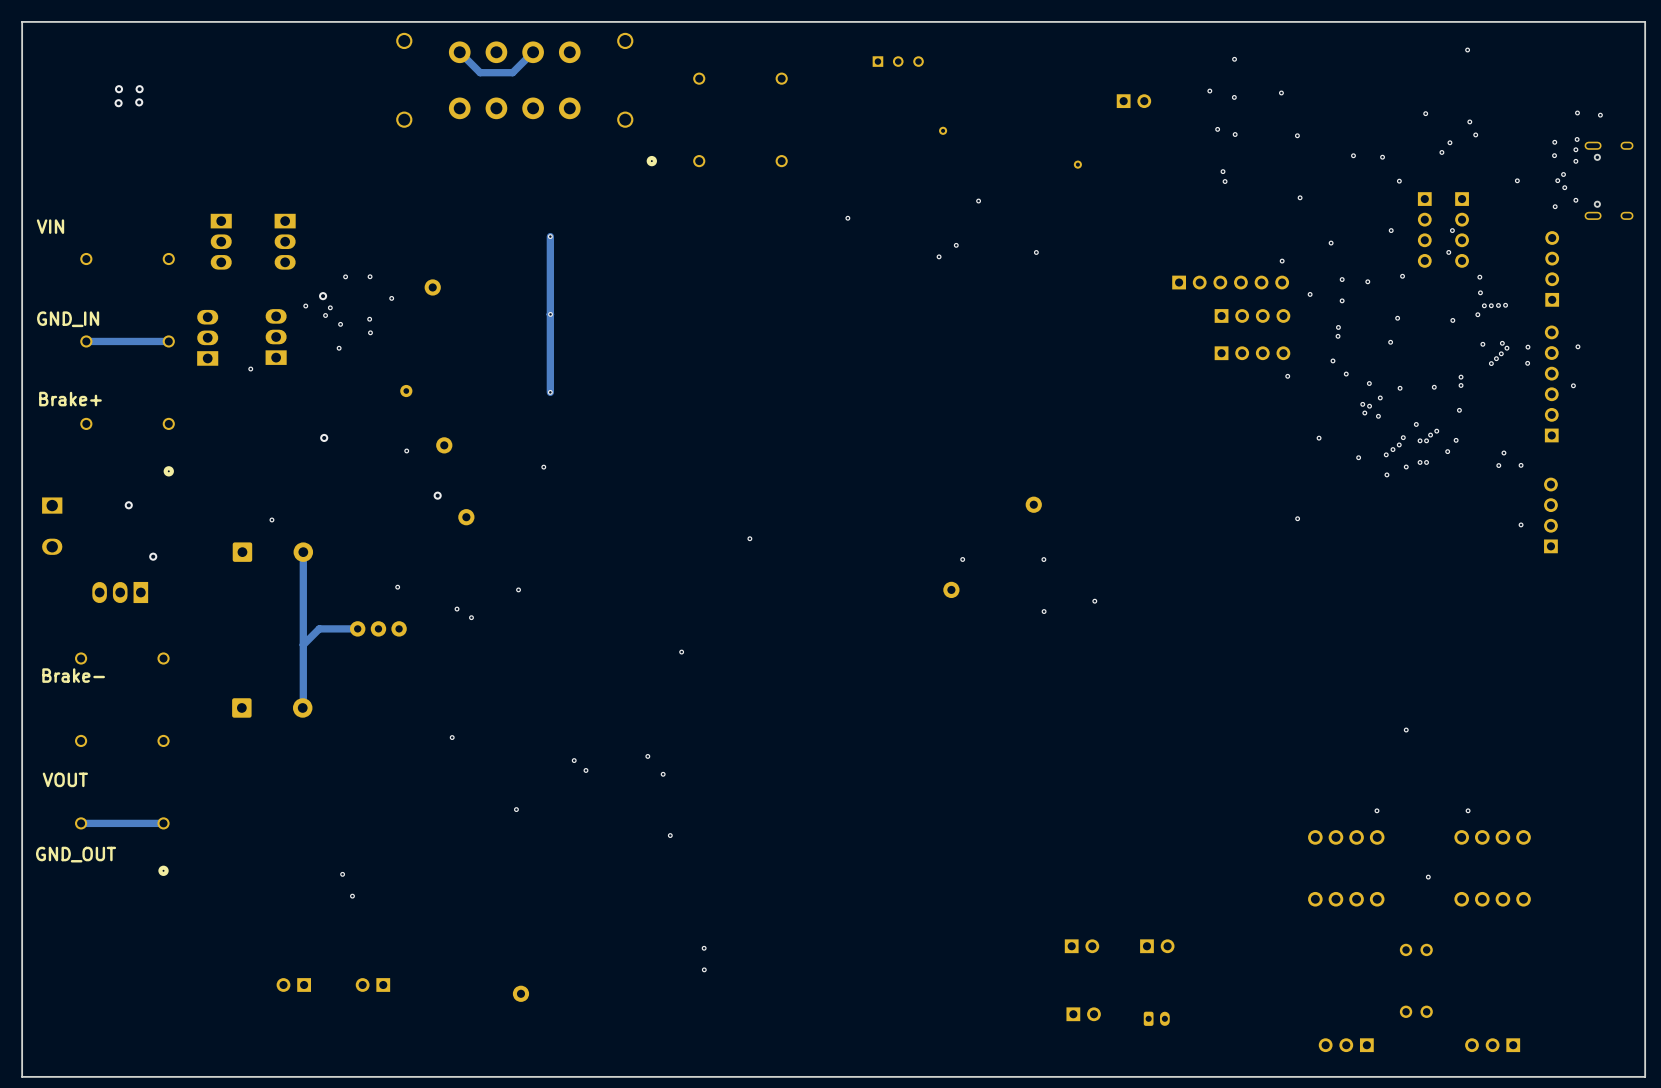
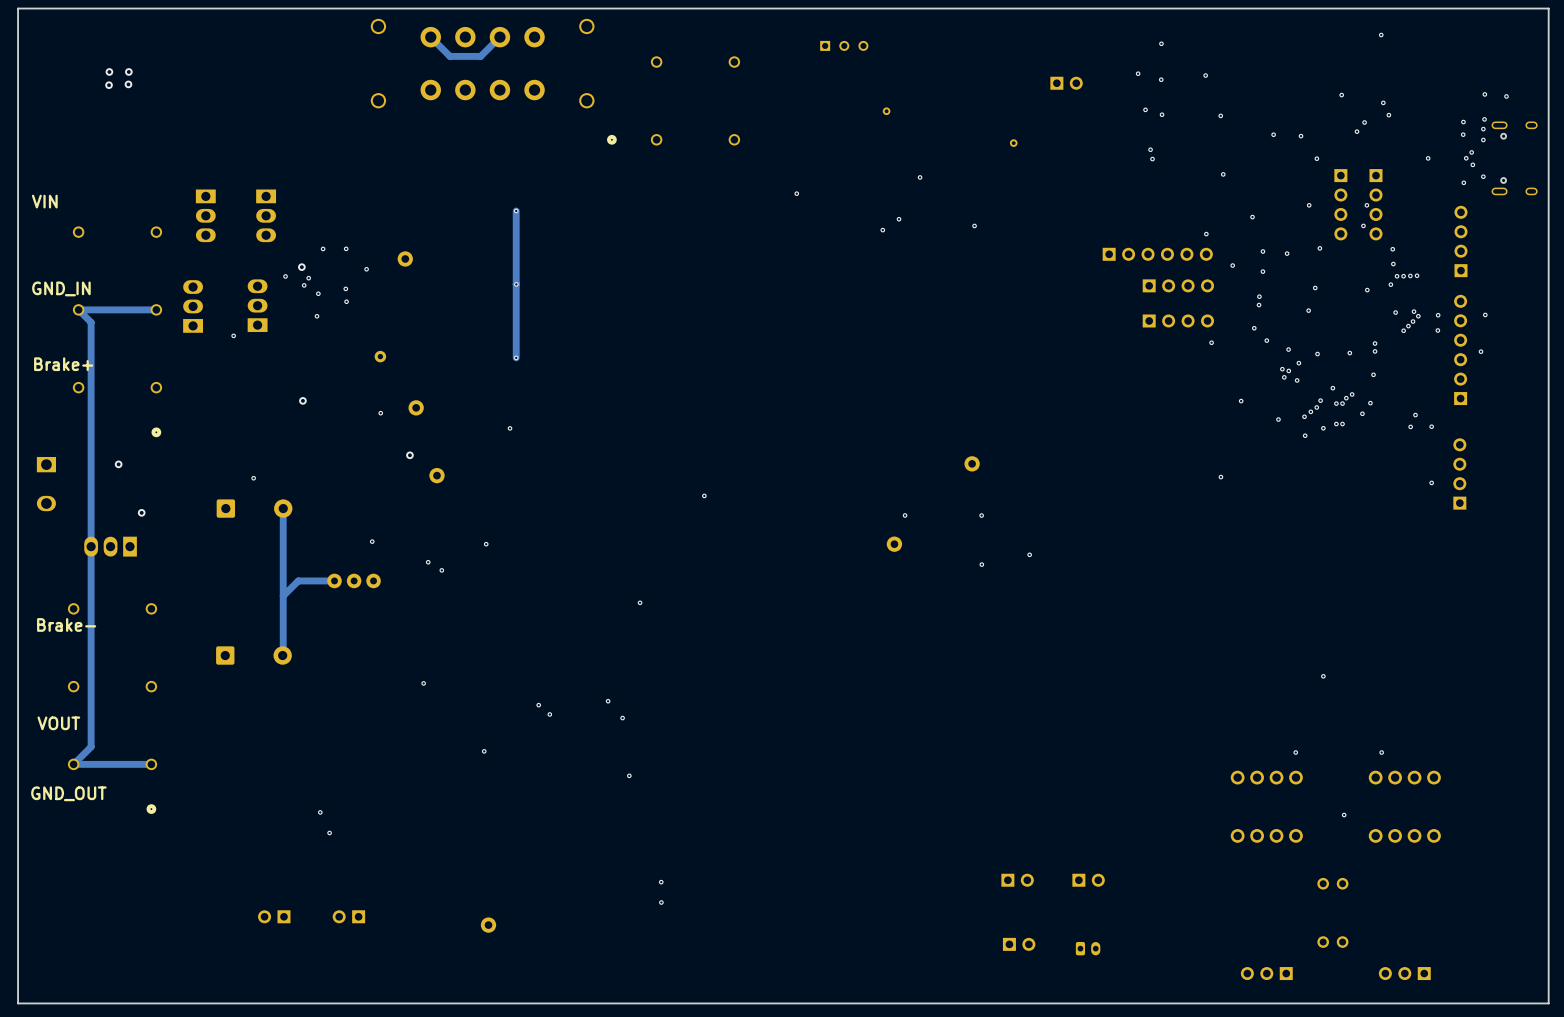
track: none -> (78, 309) (91, 322) (91, 746) (73, 764)

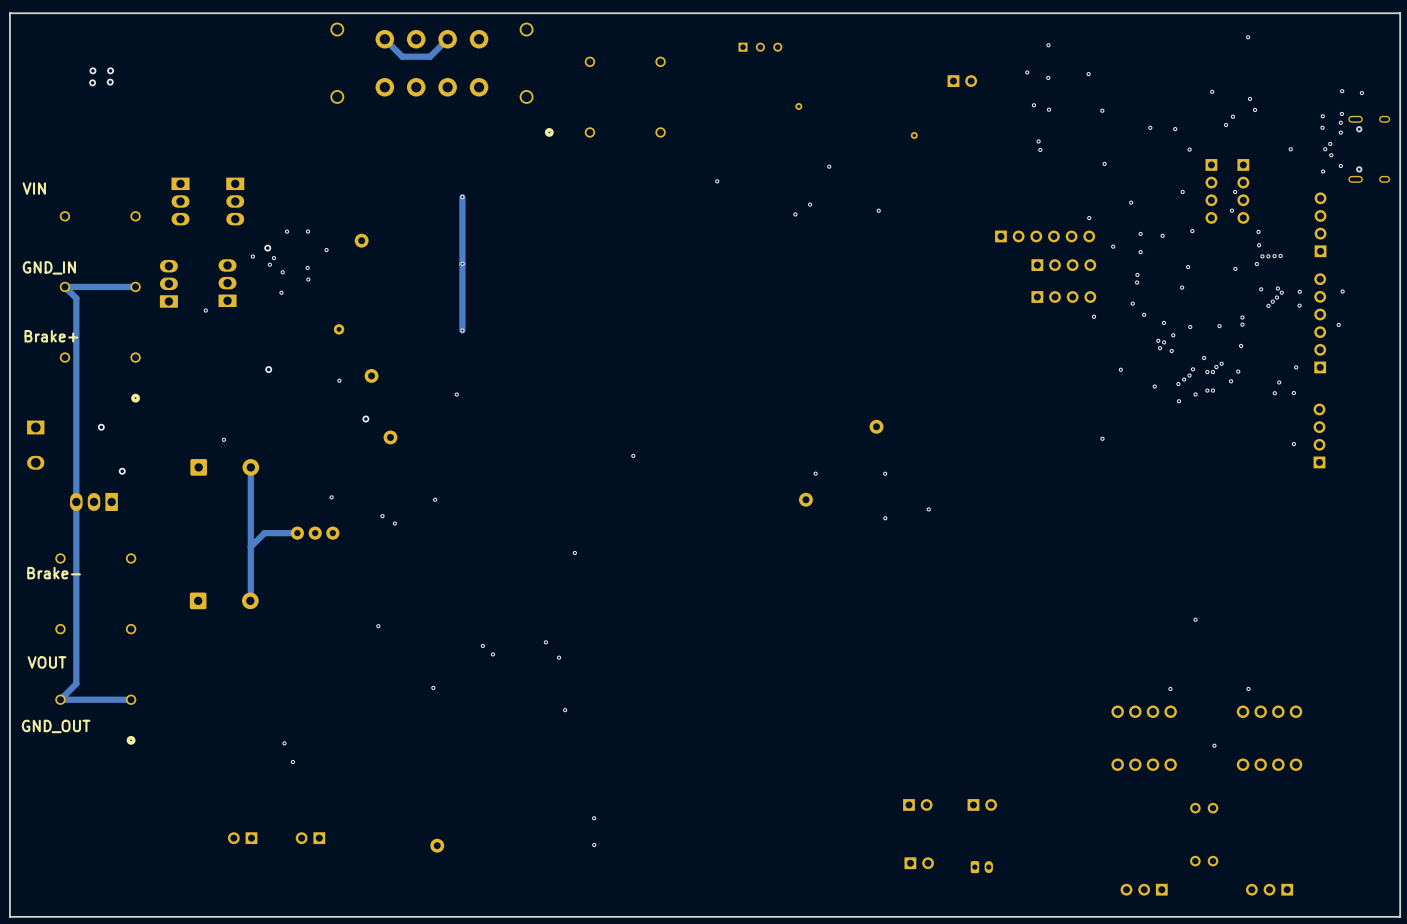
via: none -> (1296, 367)
via: (661, 882) -> none
via: none -> (594, 818)
via: (661, 902) -> none
via: none -> (594, 845)

